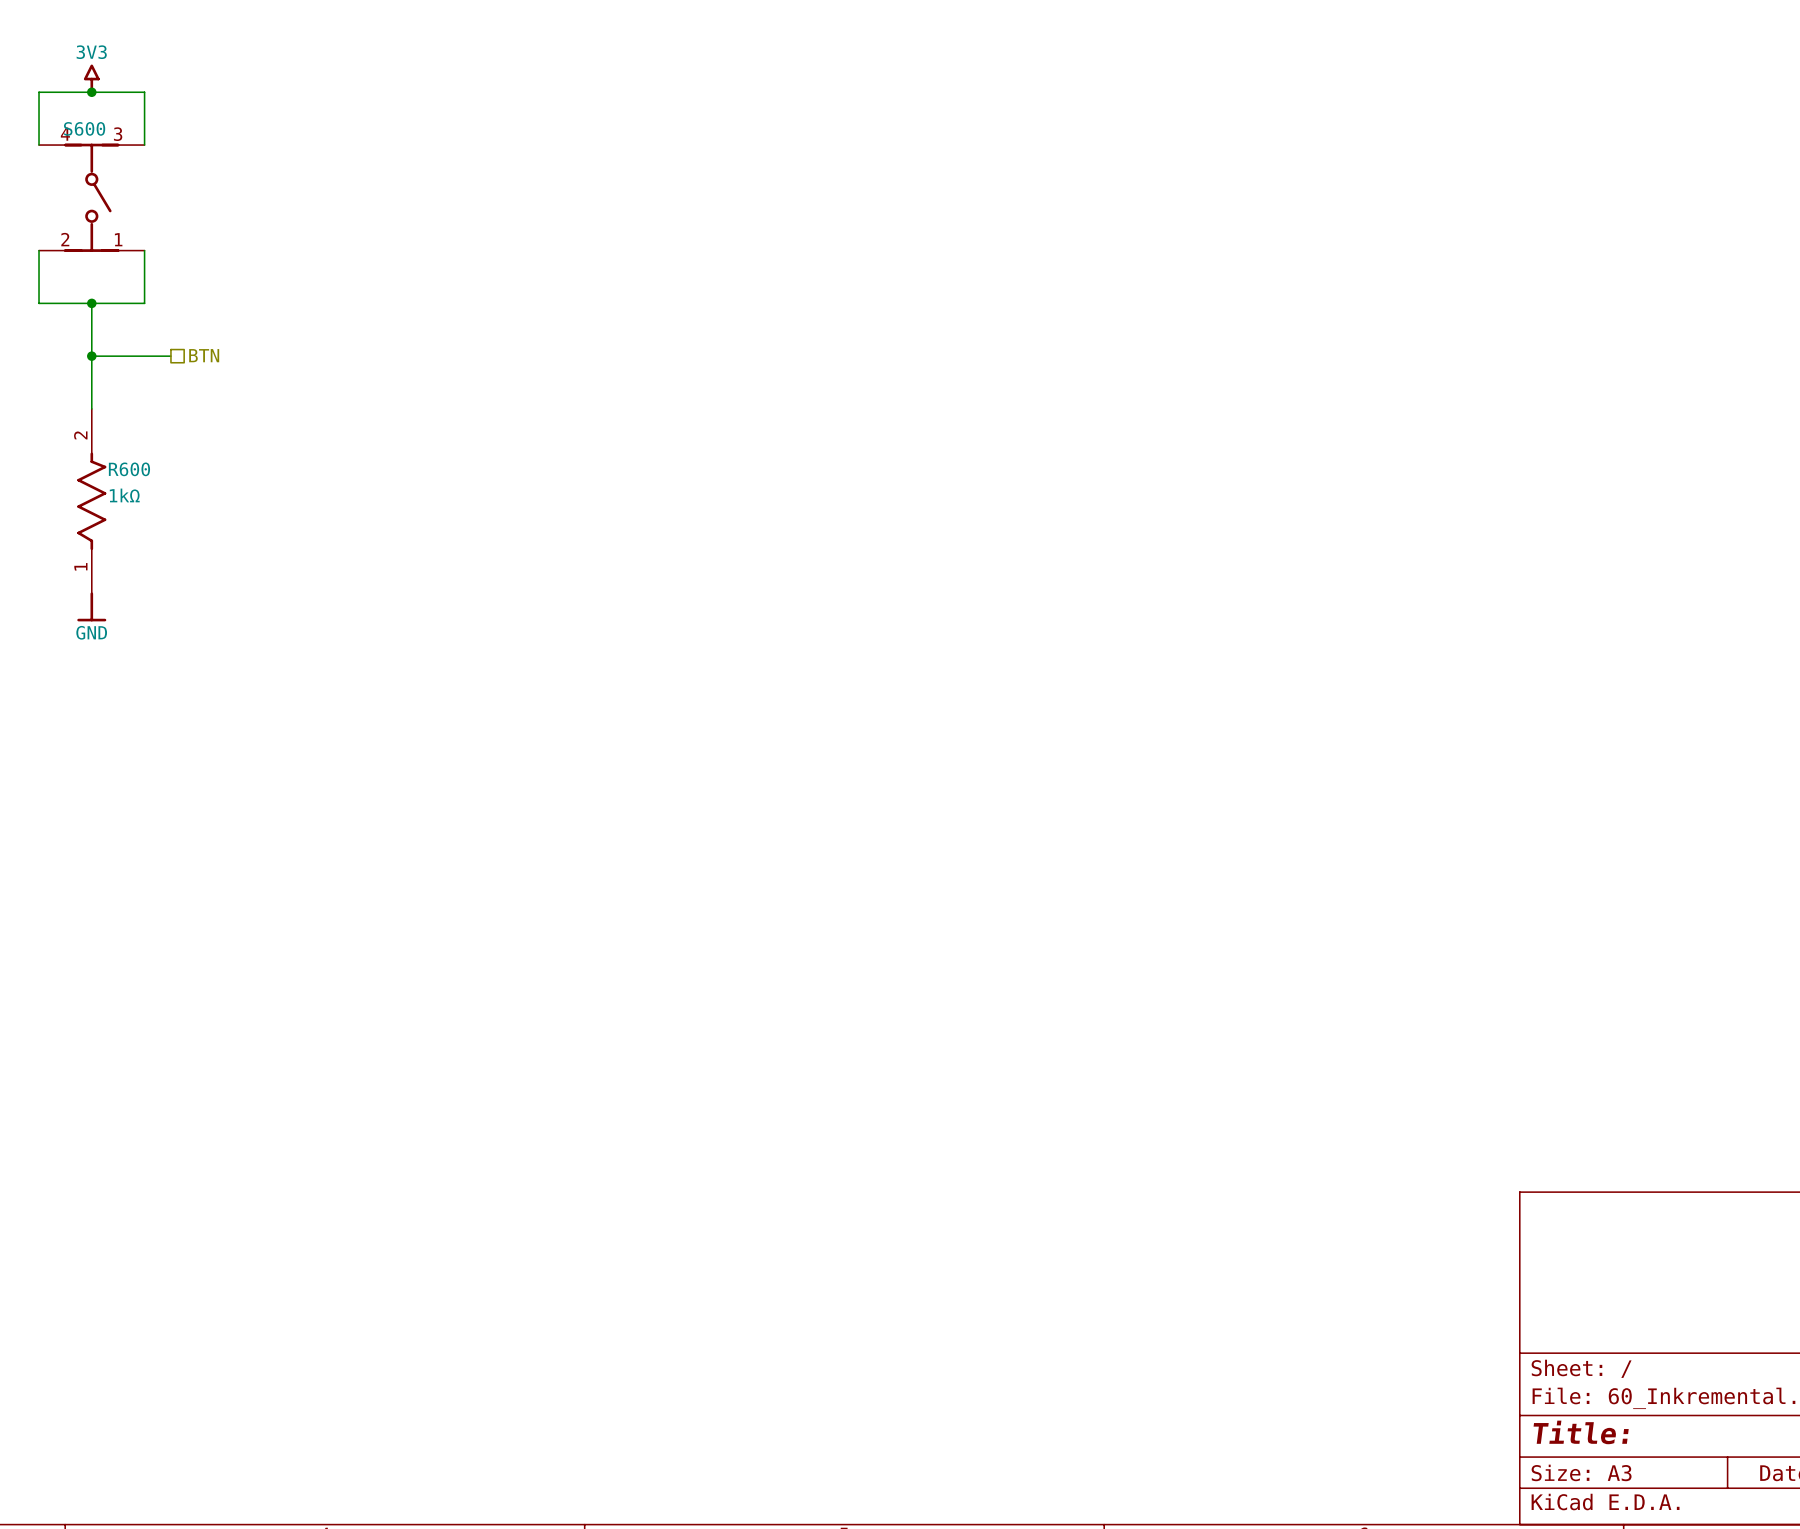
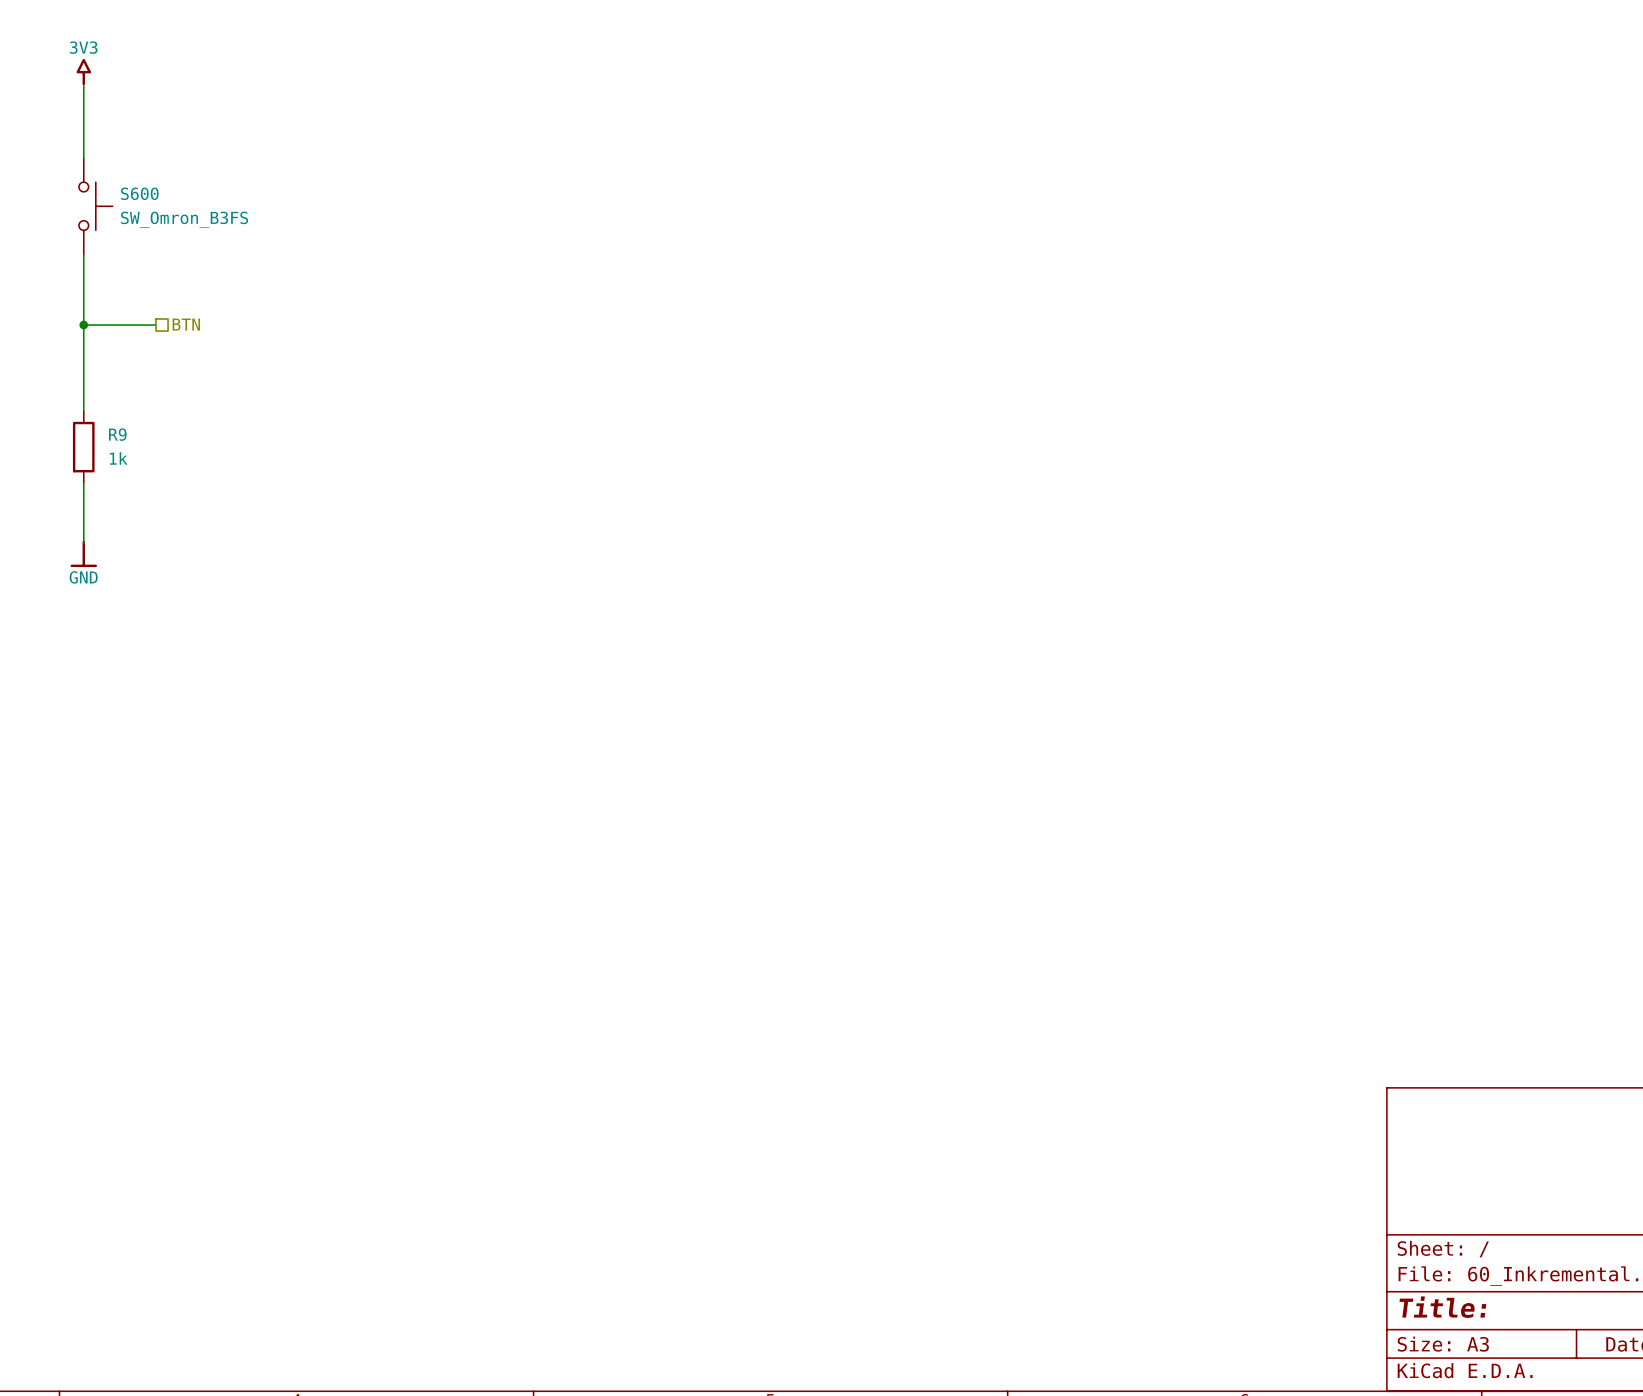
junction: (91, 92) -> none
wire: none -> (83, 85) (83, 158)
S600 name position: S600 (84, 128) -> S600 (139, 193)
S600 symbol: [39, 143, 145, 252] -> [78, 158, 113, 255]
wire: (39, 145) (39, 92) (144, 92) (144, 145) -> none
S600 value: none -> SW_Omron_B3FS (184, 219)
wire: (39, 250) (39, 303) (144, 303) (144, 250) -> none
wire: none -> (83, 254) (83, 276)
junction: (91, 303) -> none
R9: none -> 1k (83, 447)
R600: 1kΩ (91, 501) -> none

